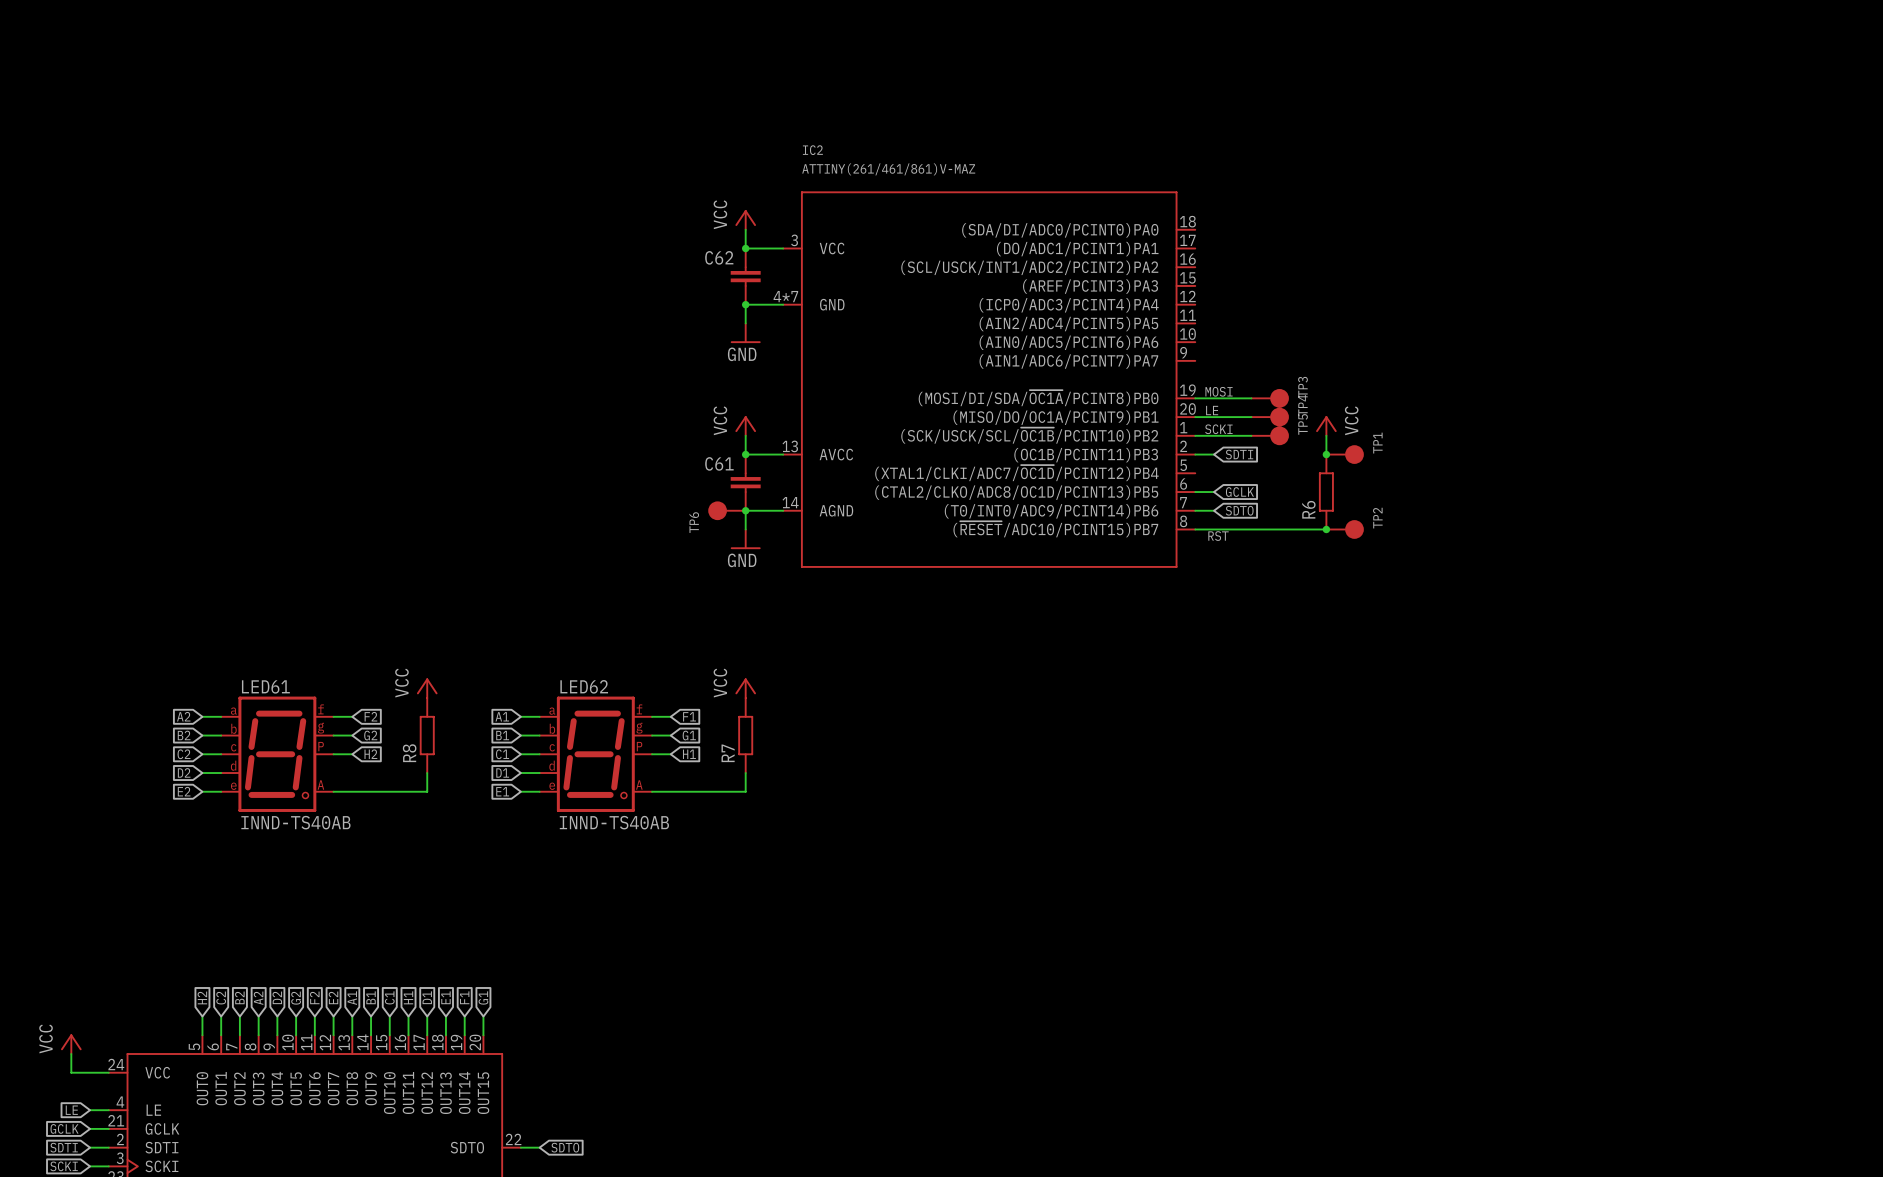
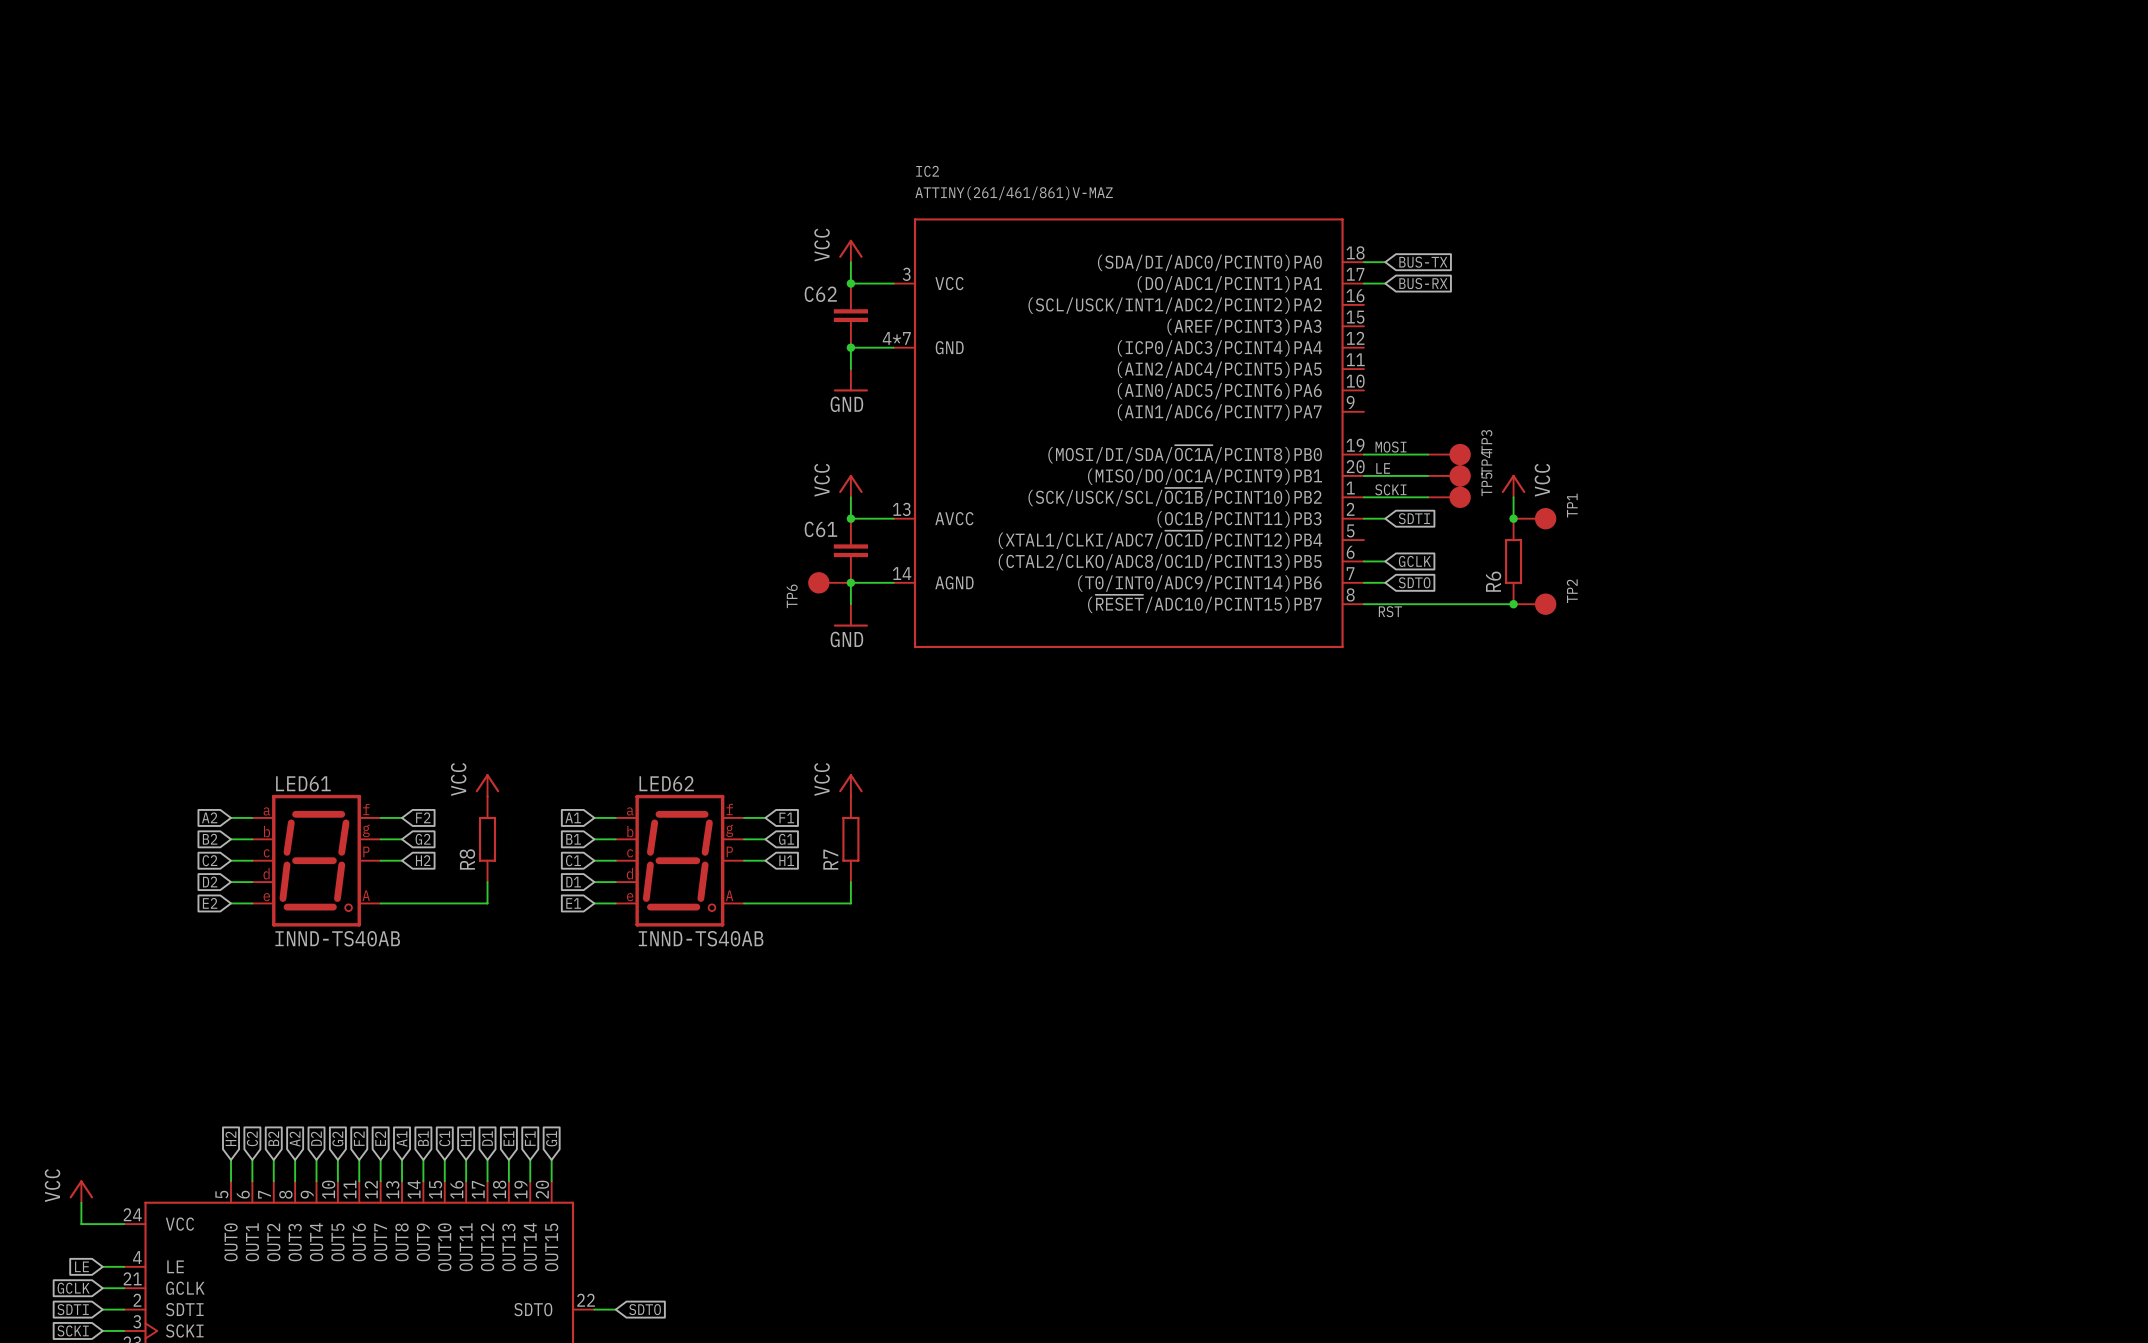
wire: none -> (1363, 262) (1385, 262)
global label: none -> BUS-TX (1423, 262)
wire: none -> (1363, 283) (1385, 283)
global label: none -> BUS-RX (1423, 283)

